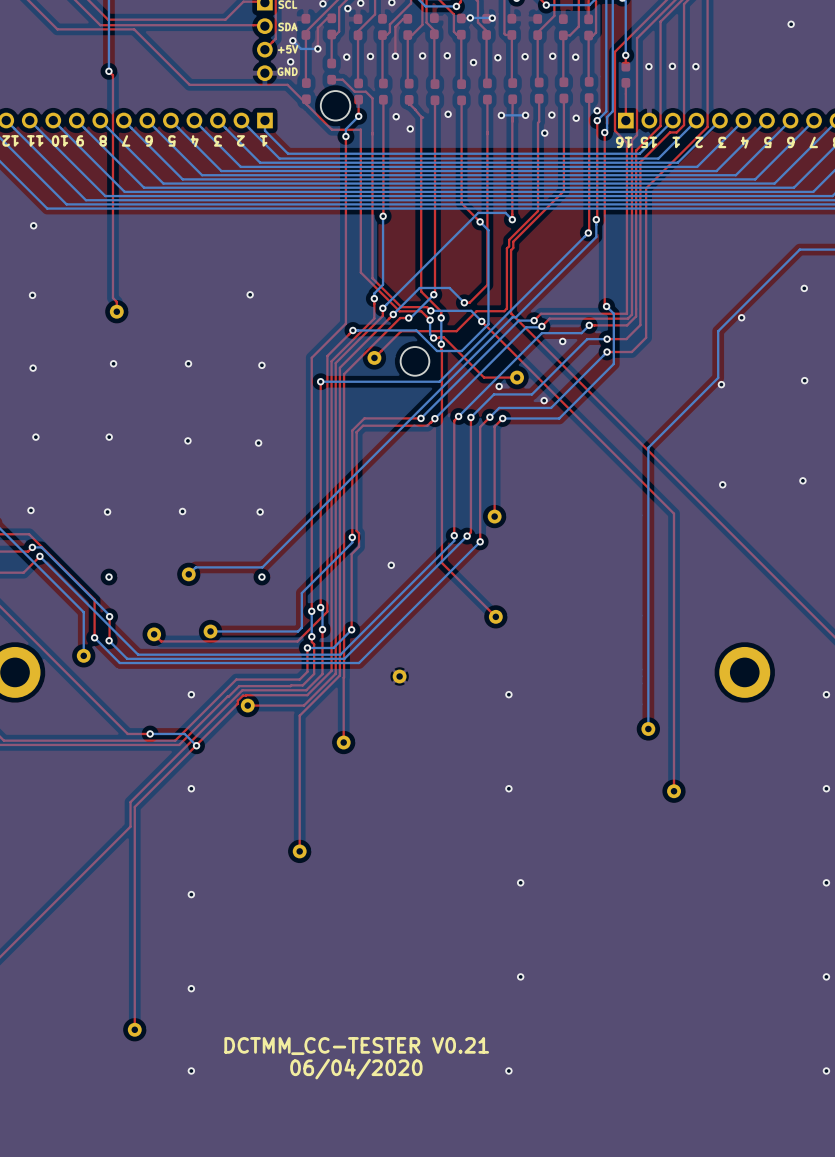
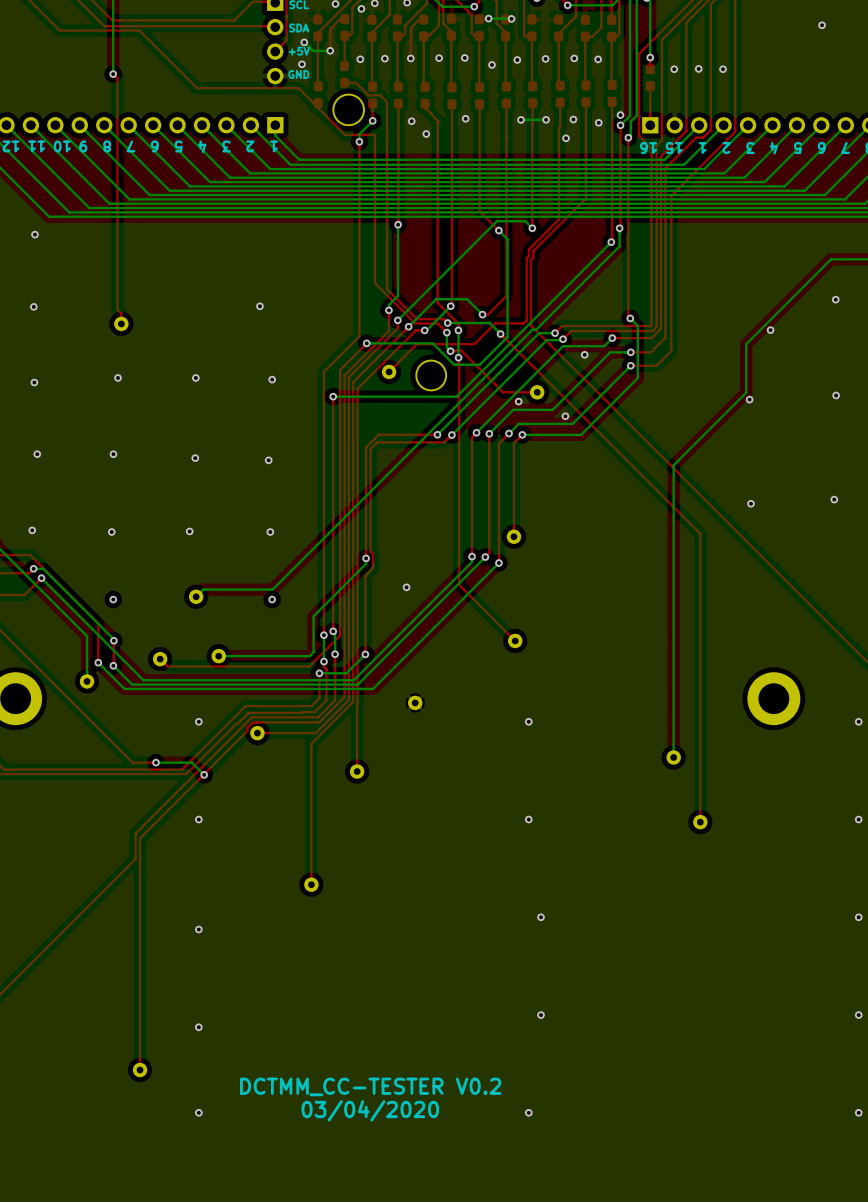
text: DCTMM_CC-TESTER V0.21 (356, 1046) -> DCTMM_CC-TESTER V0.2 (370, 1086)
text: 06/04/2020 (356, 1069) -> 03/04/2020 (370, 1110)

